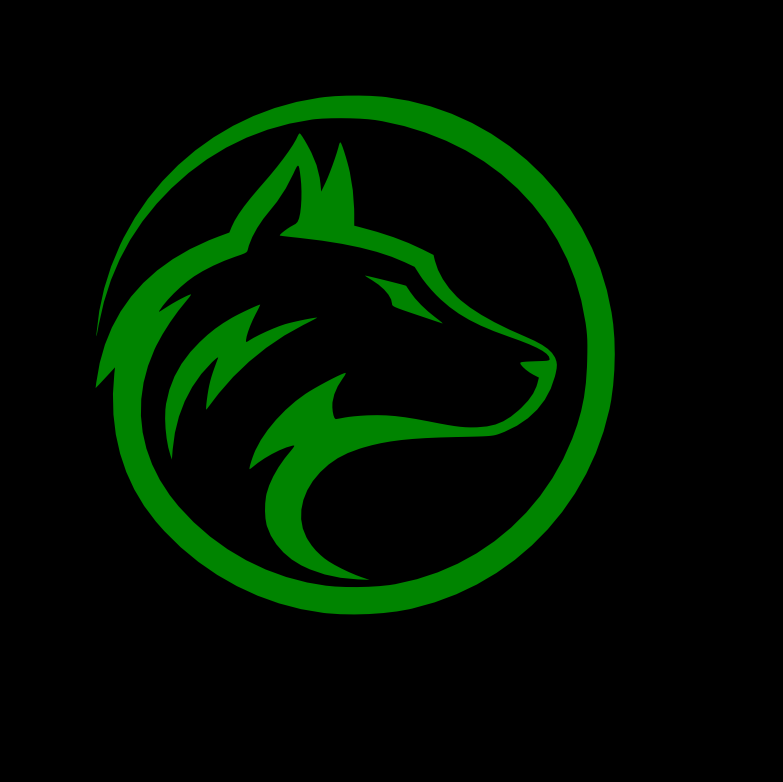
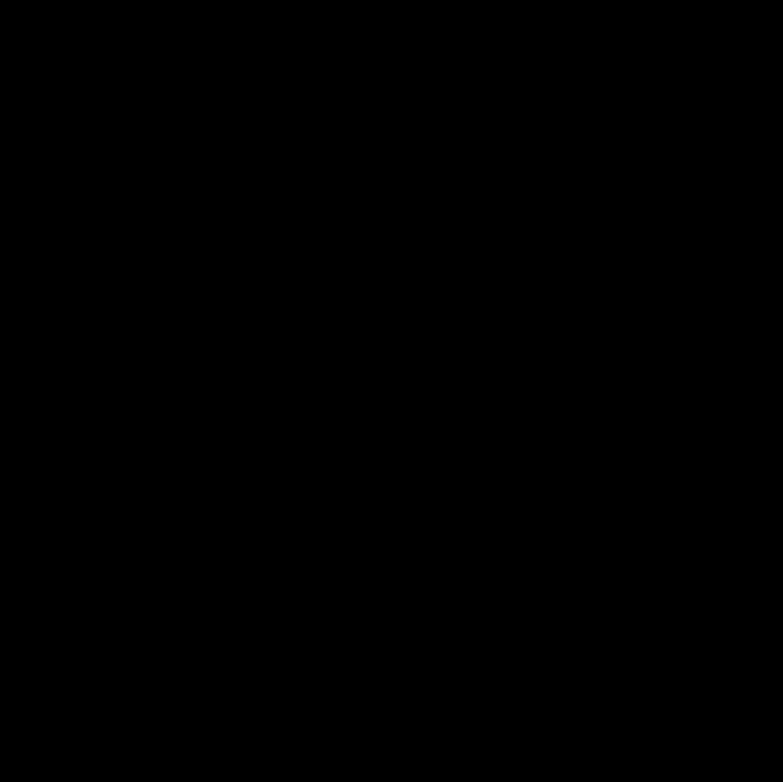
drawing: [95, 95, 615, 615] -> none

